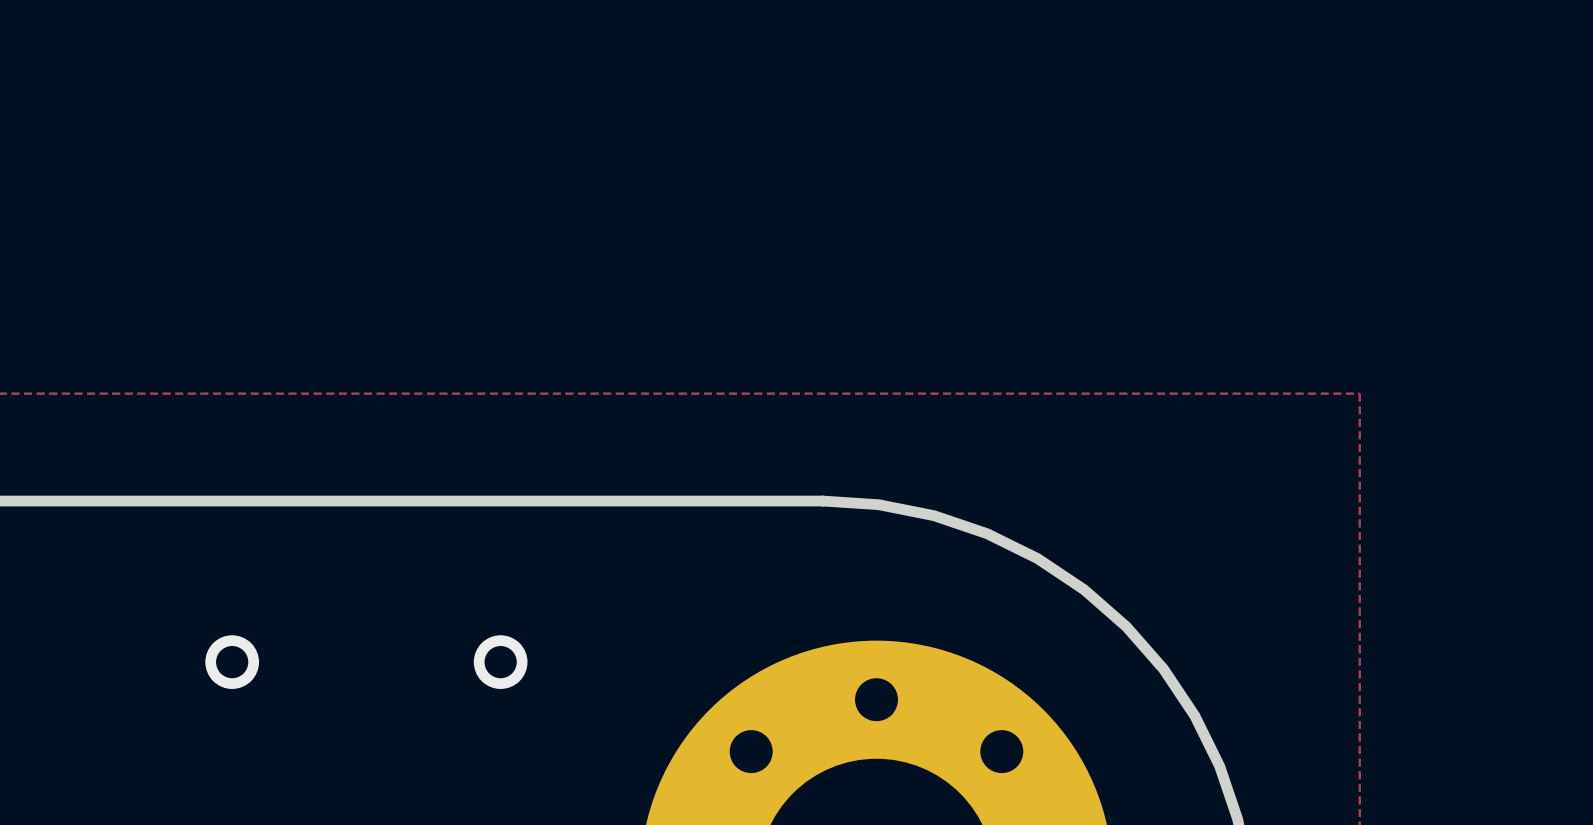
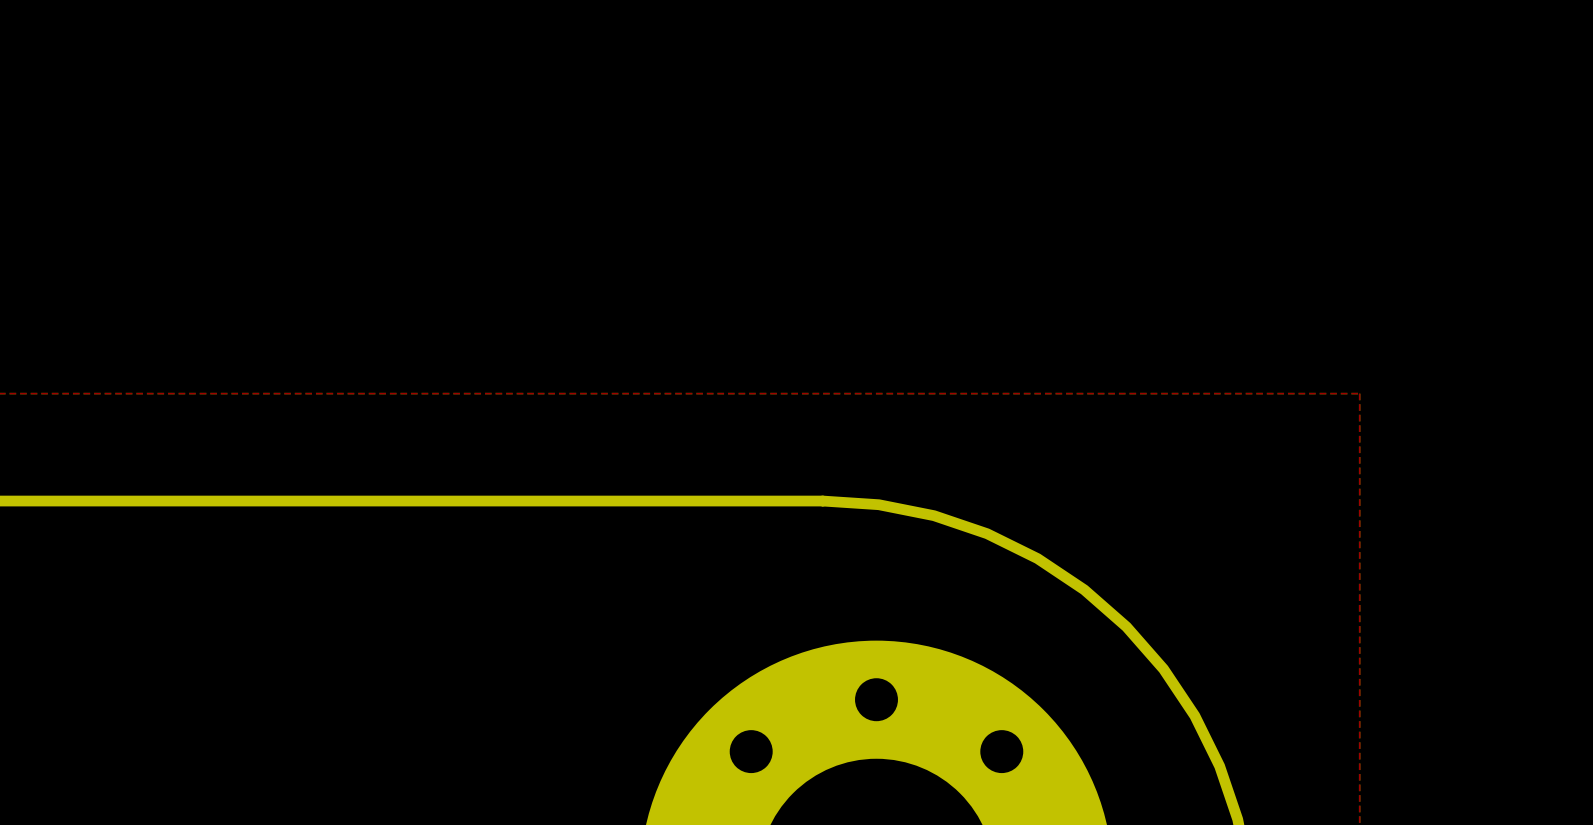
via: (232, 662) -> none
via: (500, 662) -> none

